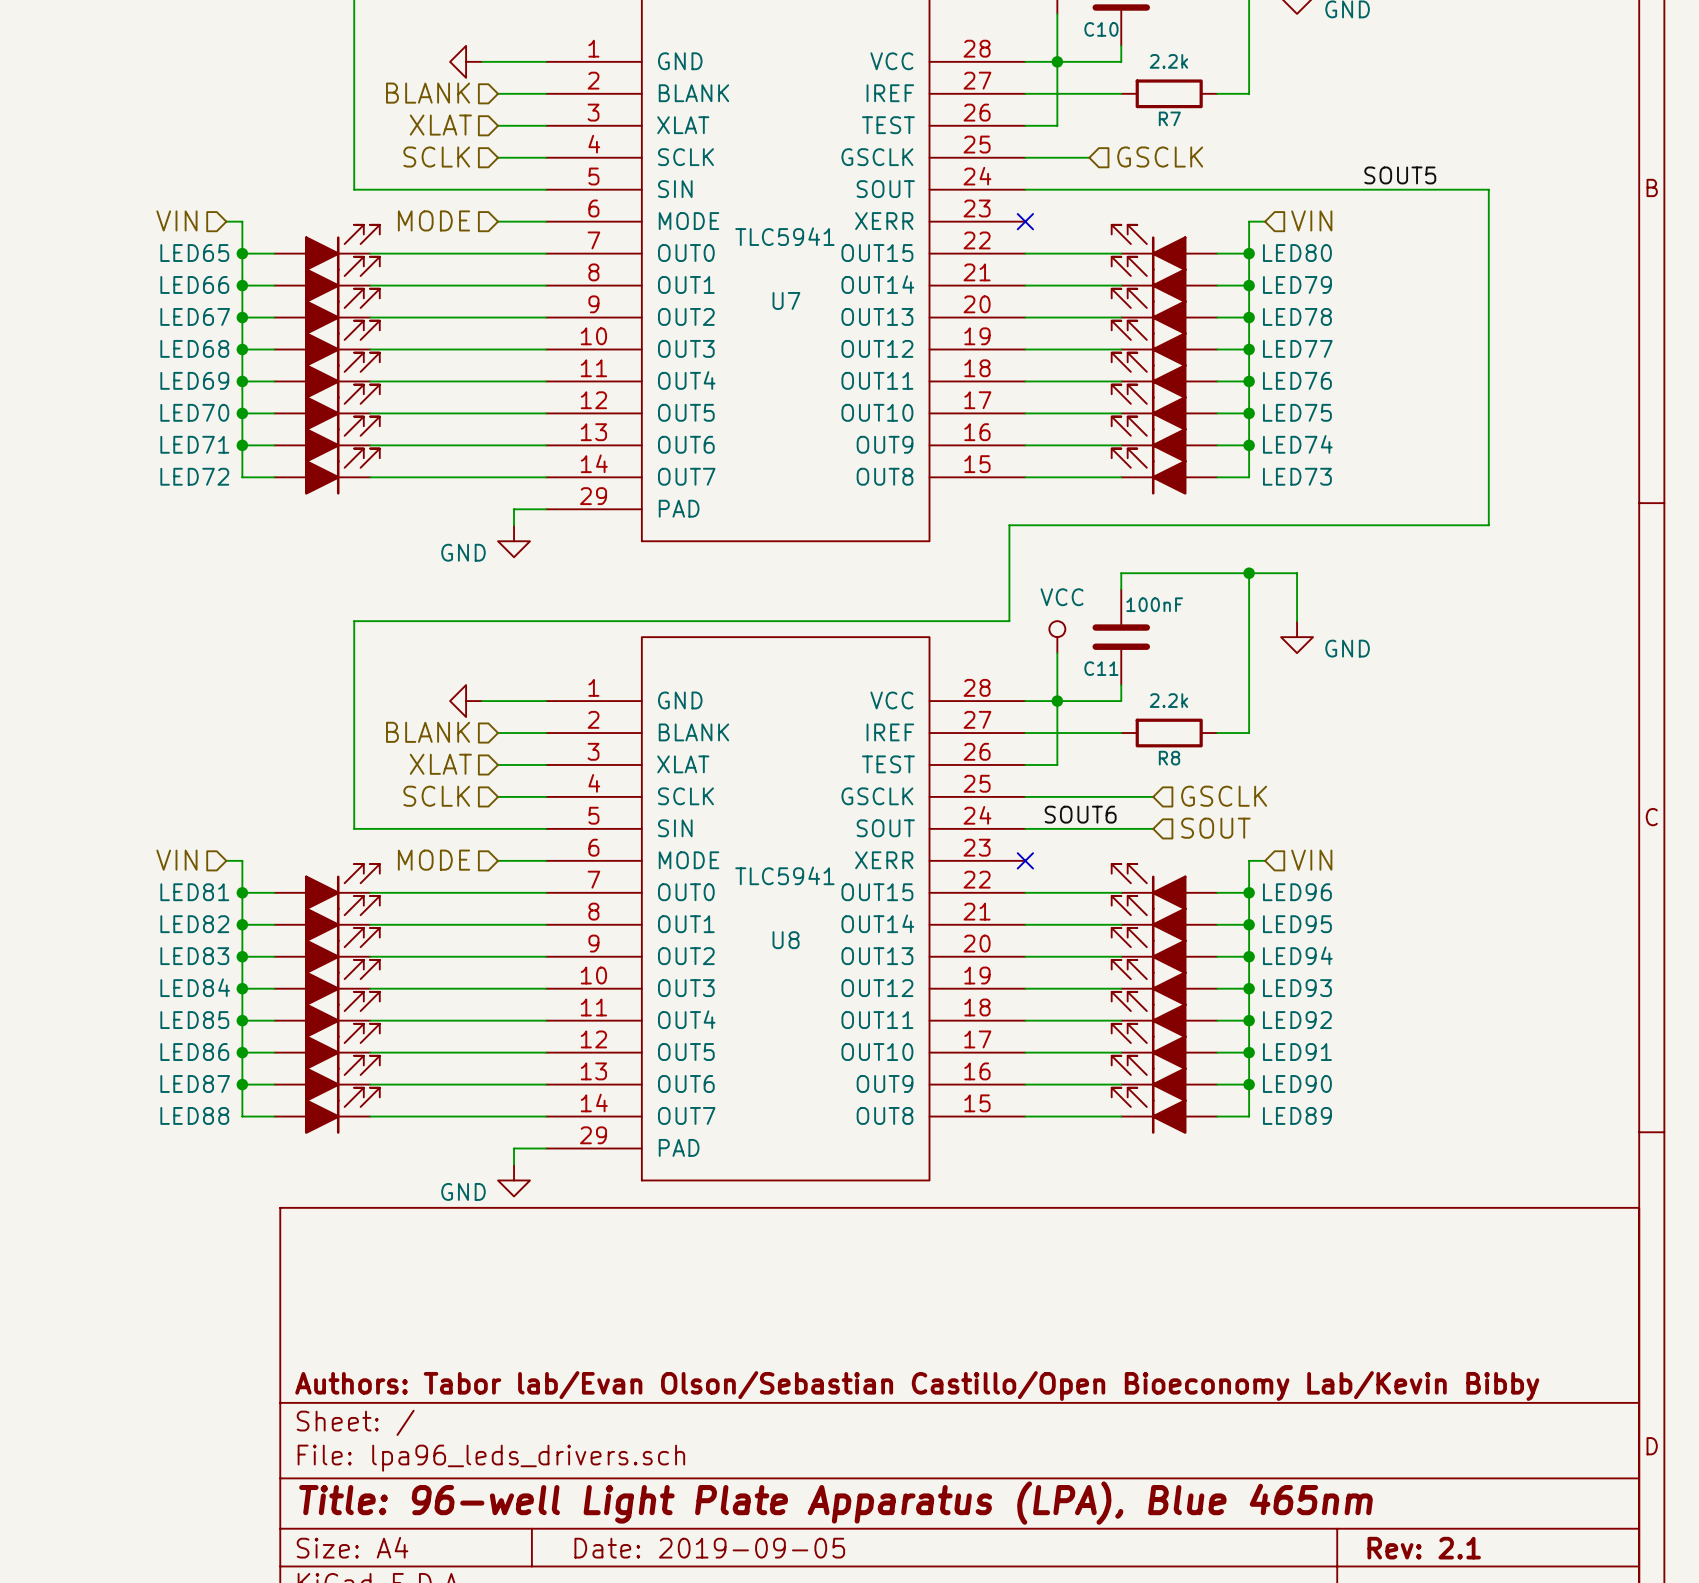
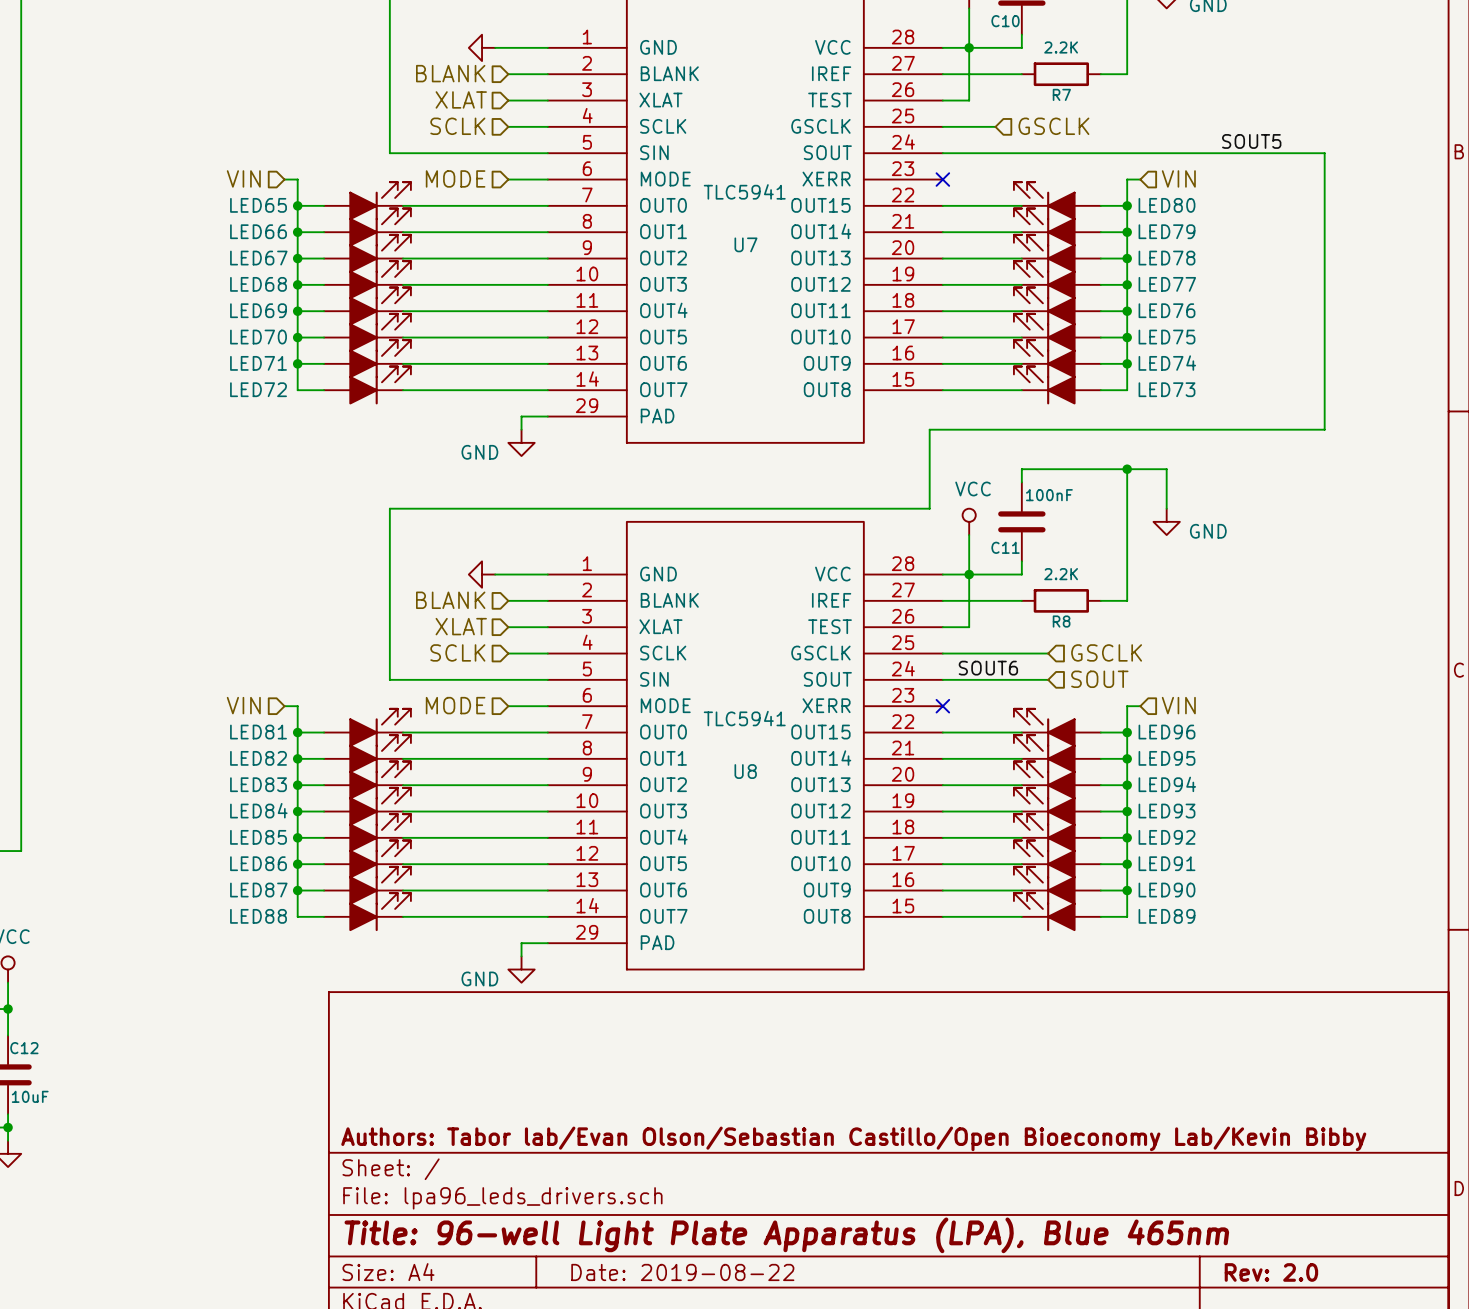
R7 value: 2.2k (1168, 61) -> 2.2K (1061, 47)
R8 value: 2.2k (1168, 700) -> 2.2K (1061, 574)
title block: Date: 2019-09-05 (709, 1548) -> Date: 2019-08-22 (682, 1272)
title block: Rev: 2.1 (1424, 1548) -> Rev: 2.0 (1271, 1272)

